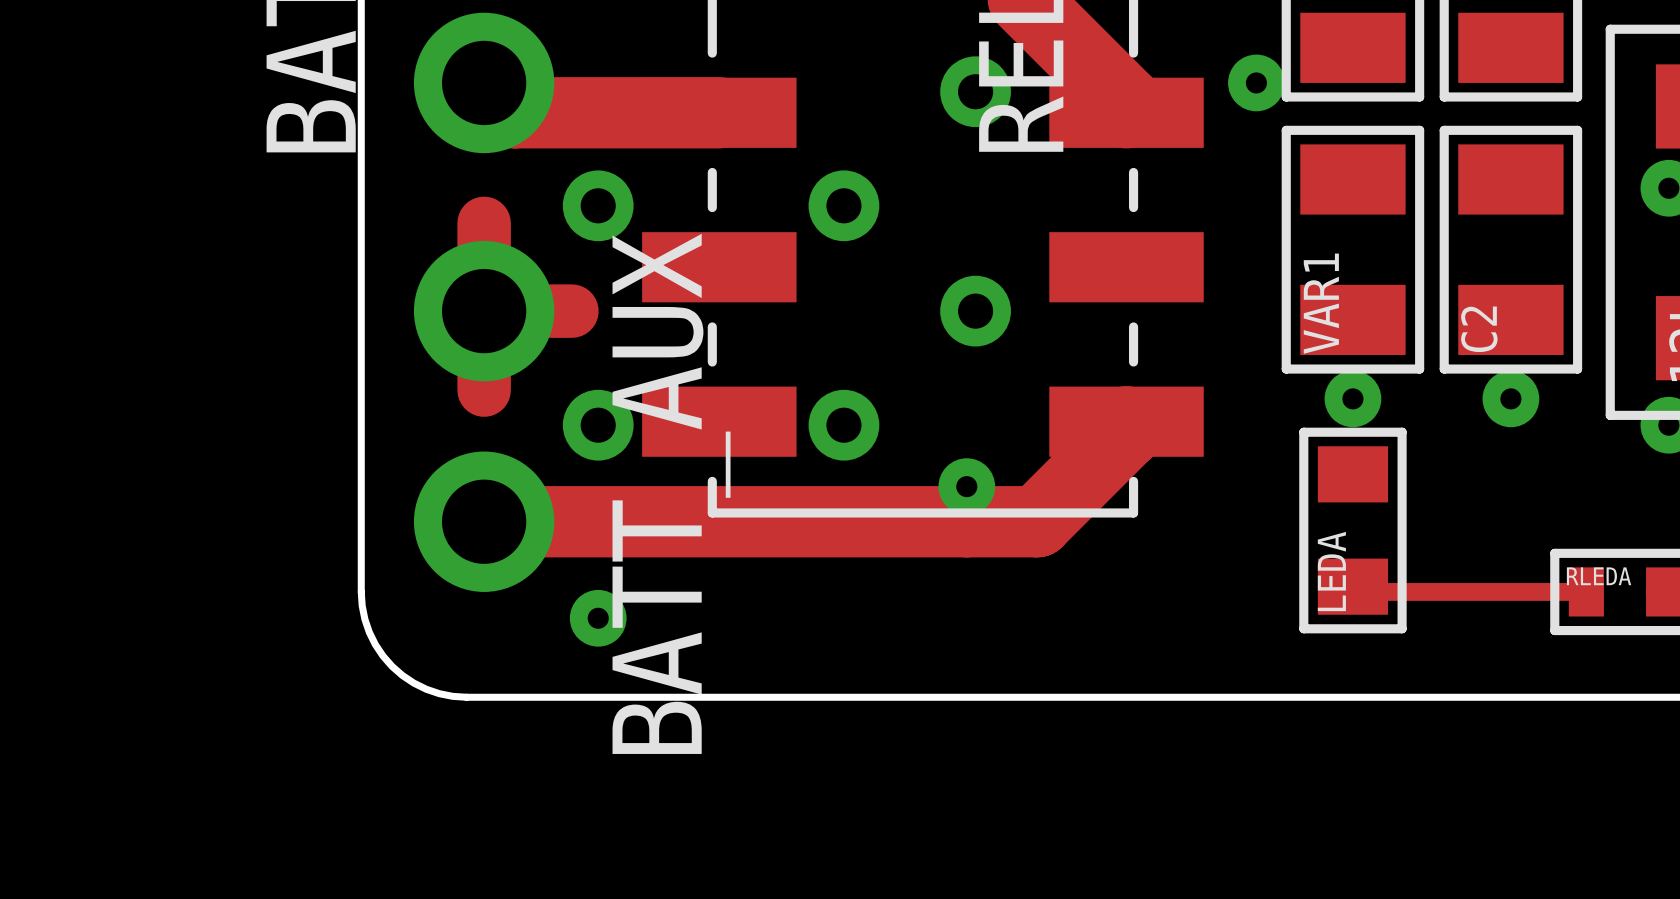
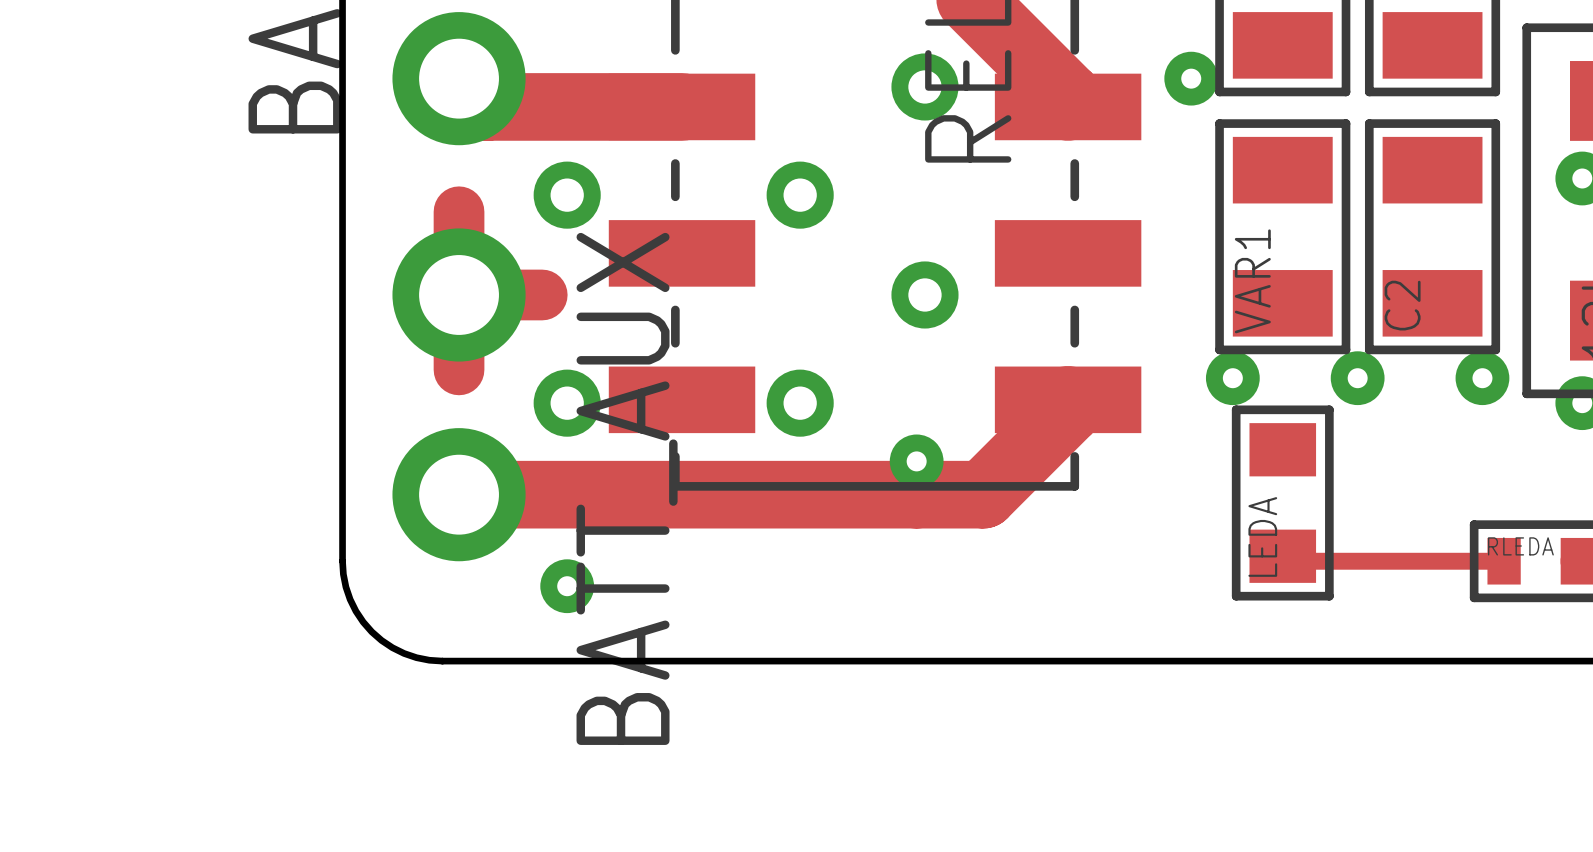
via position: (1352, 398) -> (1232, 378)
via: none -> (1357, 378)
via position: (1510, 398) -> (1482, 378)

